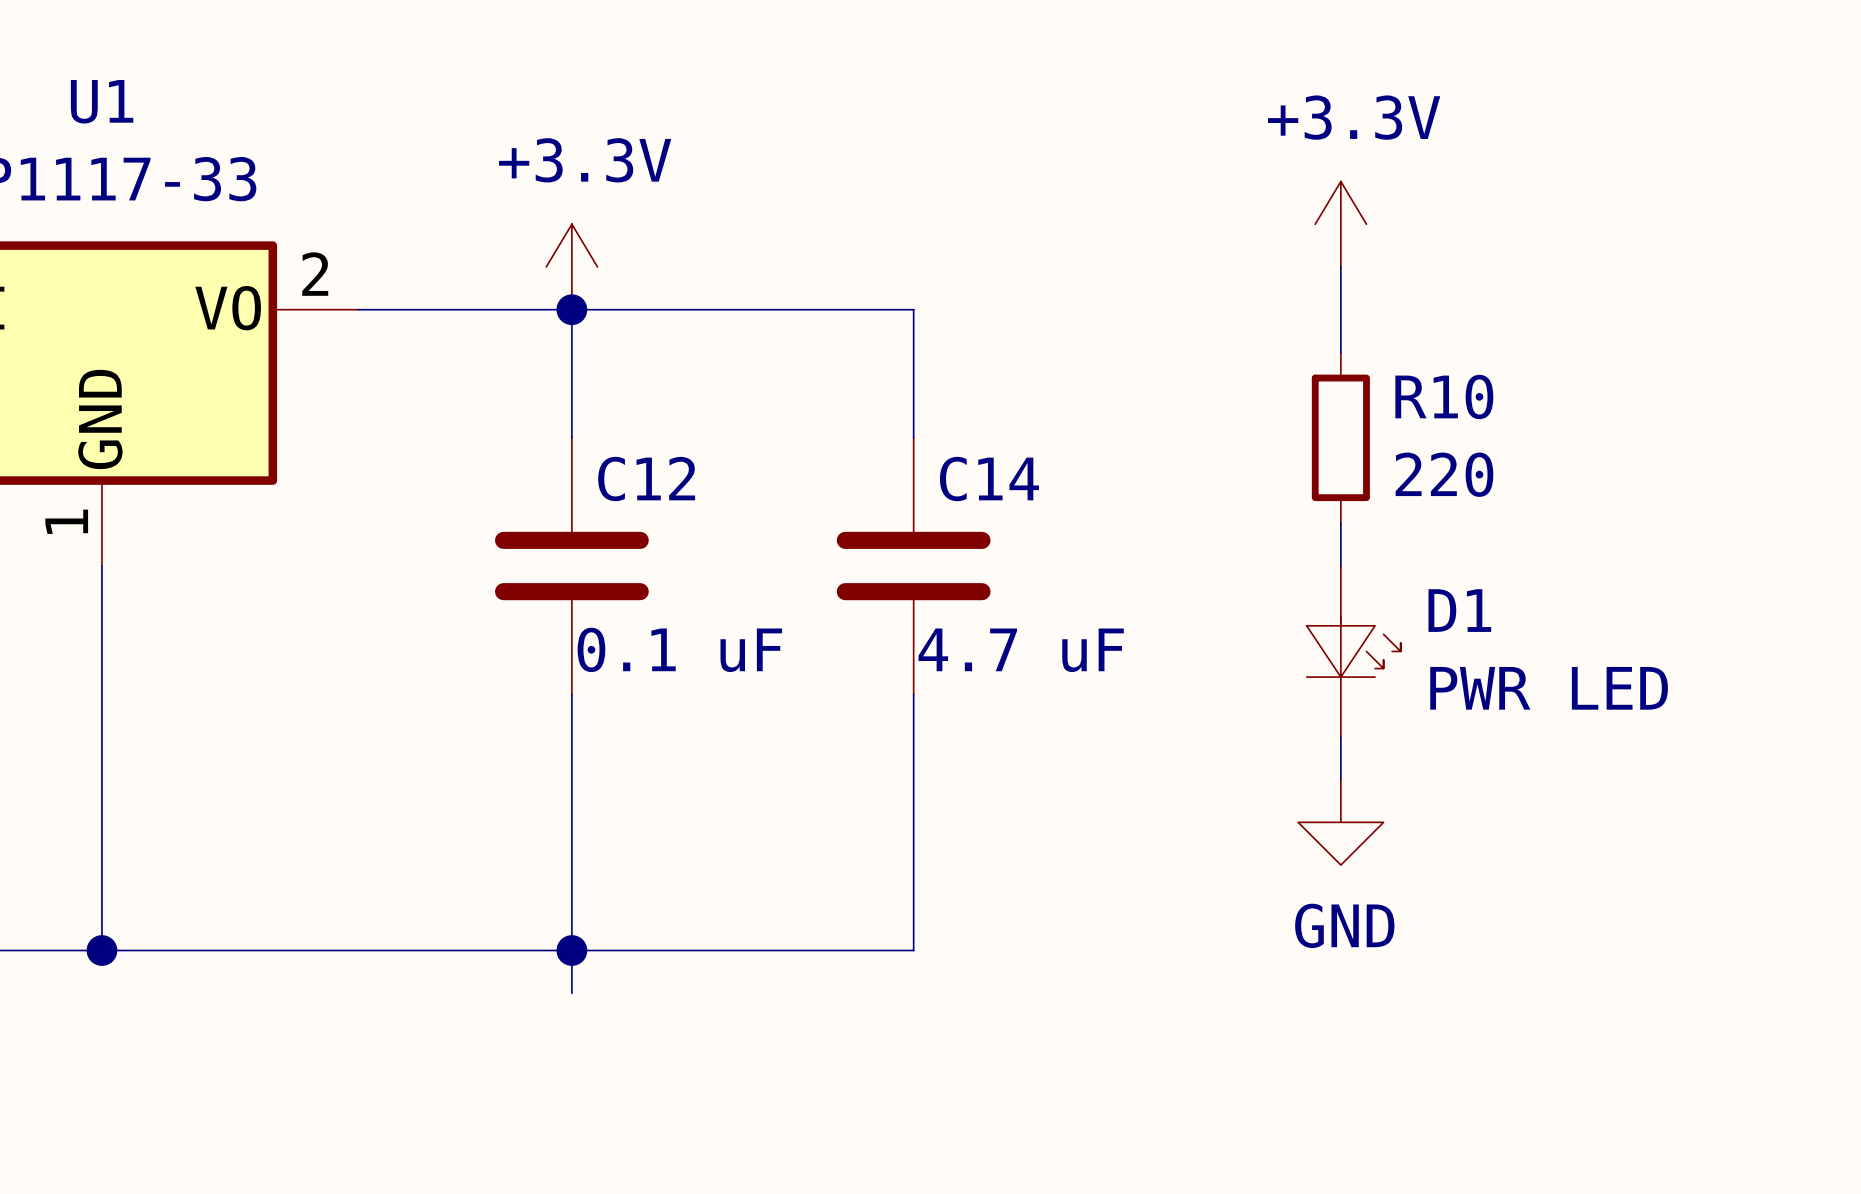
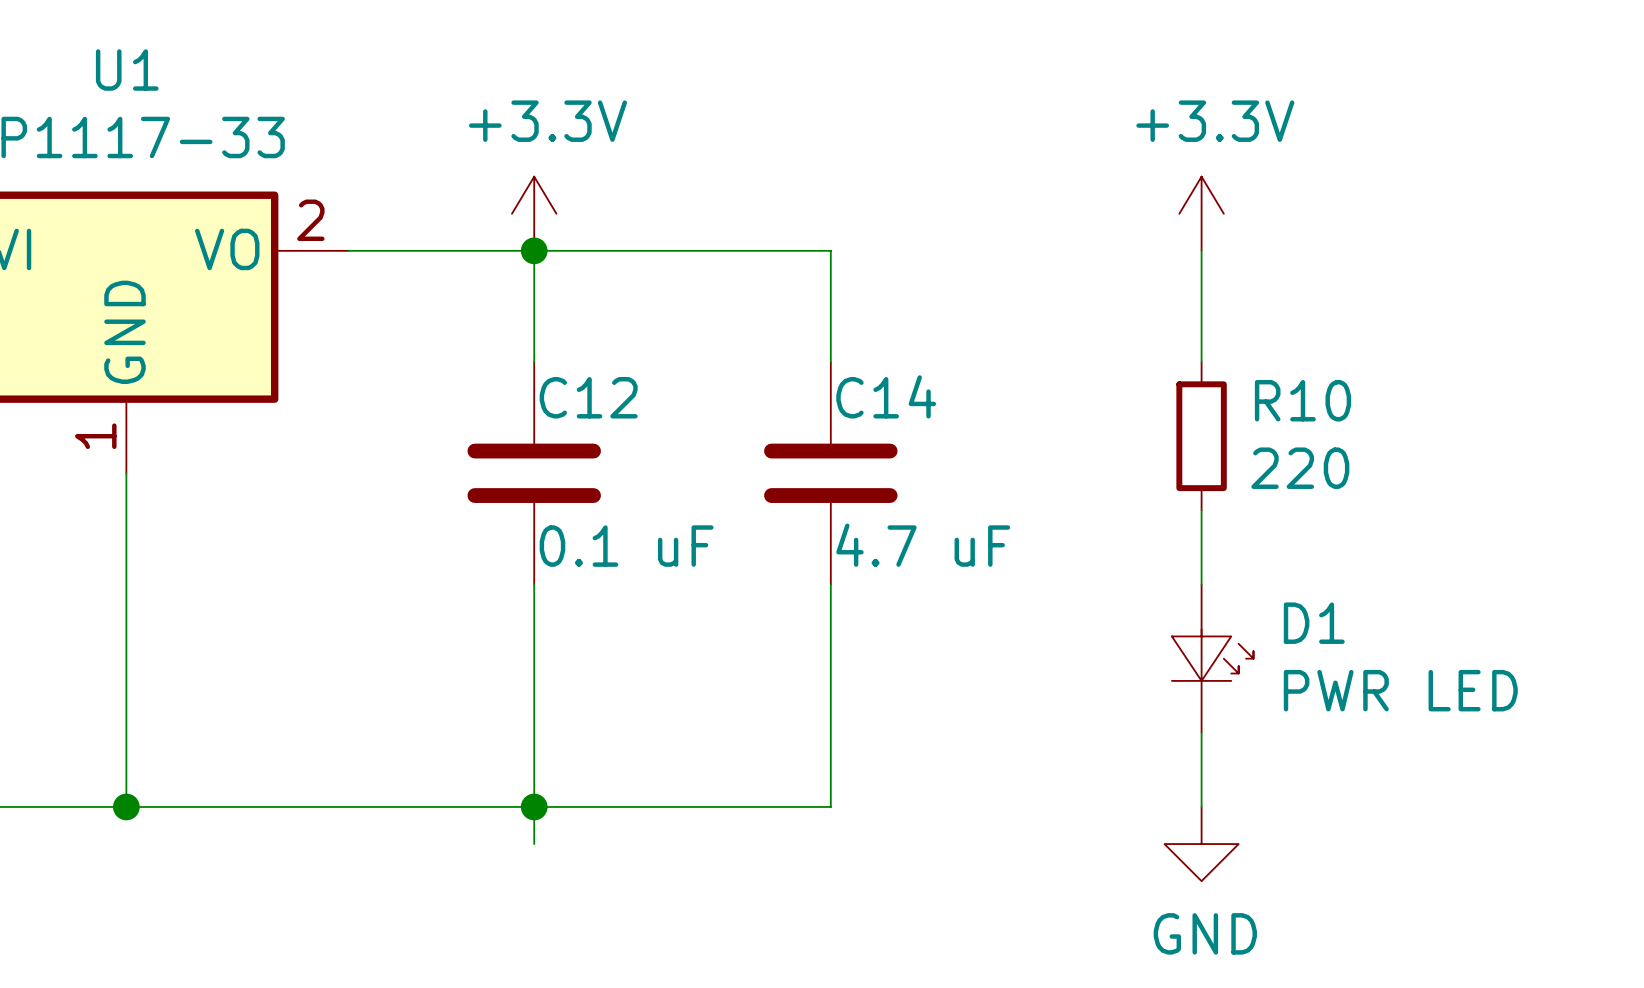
power symbol position: +3.3V (1340, 224) -> +3.3V (1201, 213)
wire: none -> (1201, 287) (1201, 362)
R10 position: (1340, 437) -> (1201, 436)
wire: (1340, 523) (1340, 566) -> none
D1 position: (1353, 651) -> (1212, 658)
power symbol position: GND (1340, 822) -> GND (1201, 844)
wire: none -> (1201, 732) (1201, 806)

